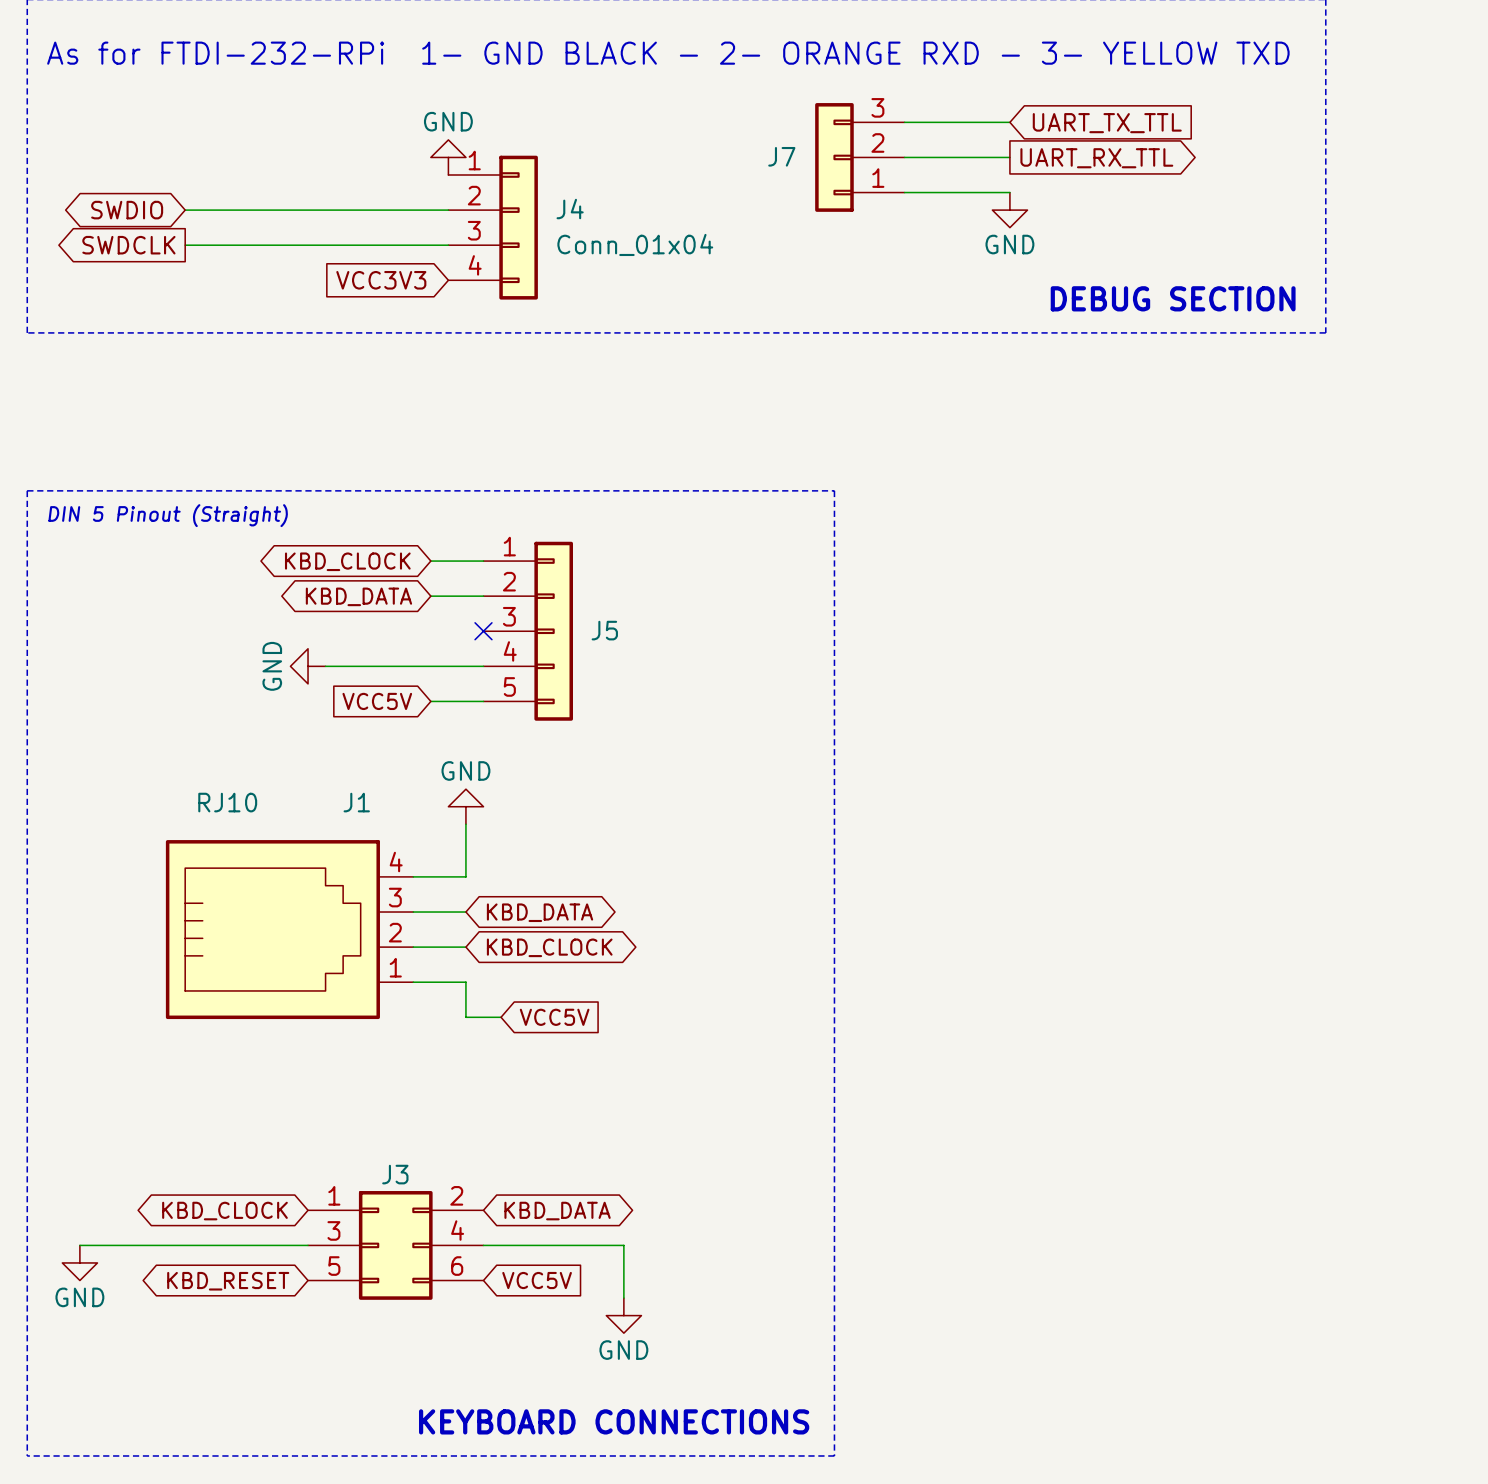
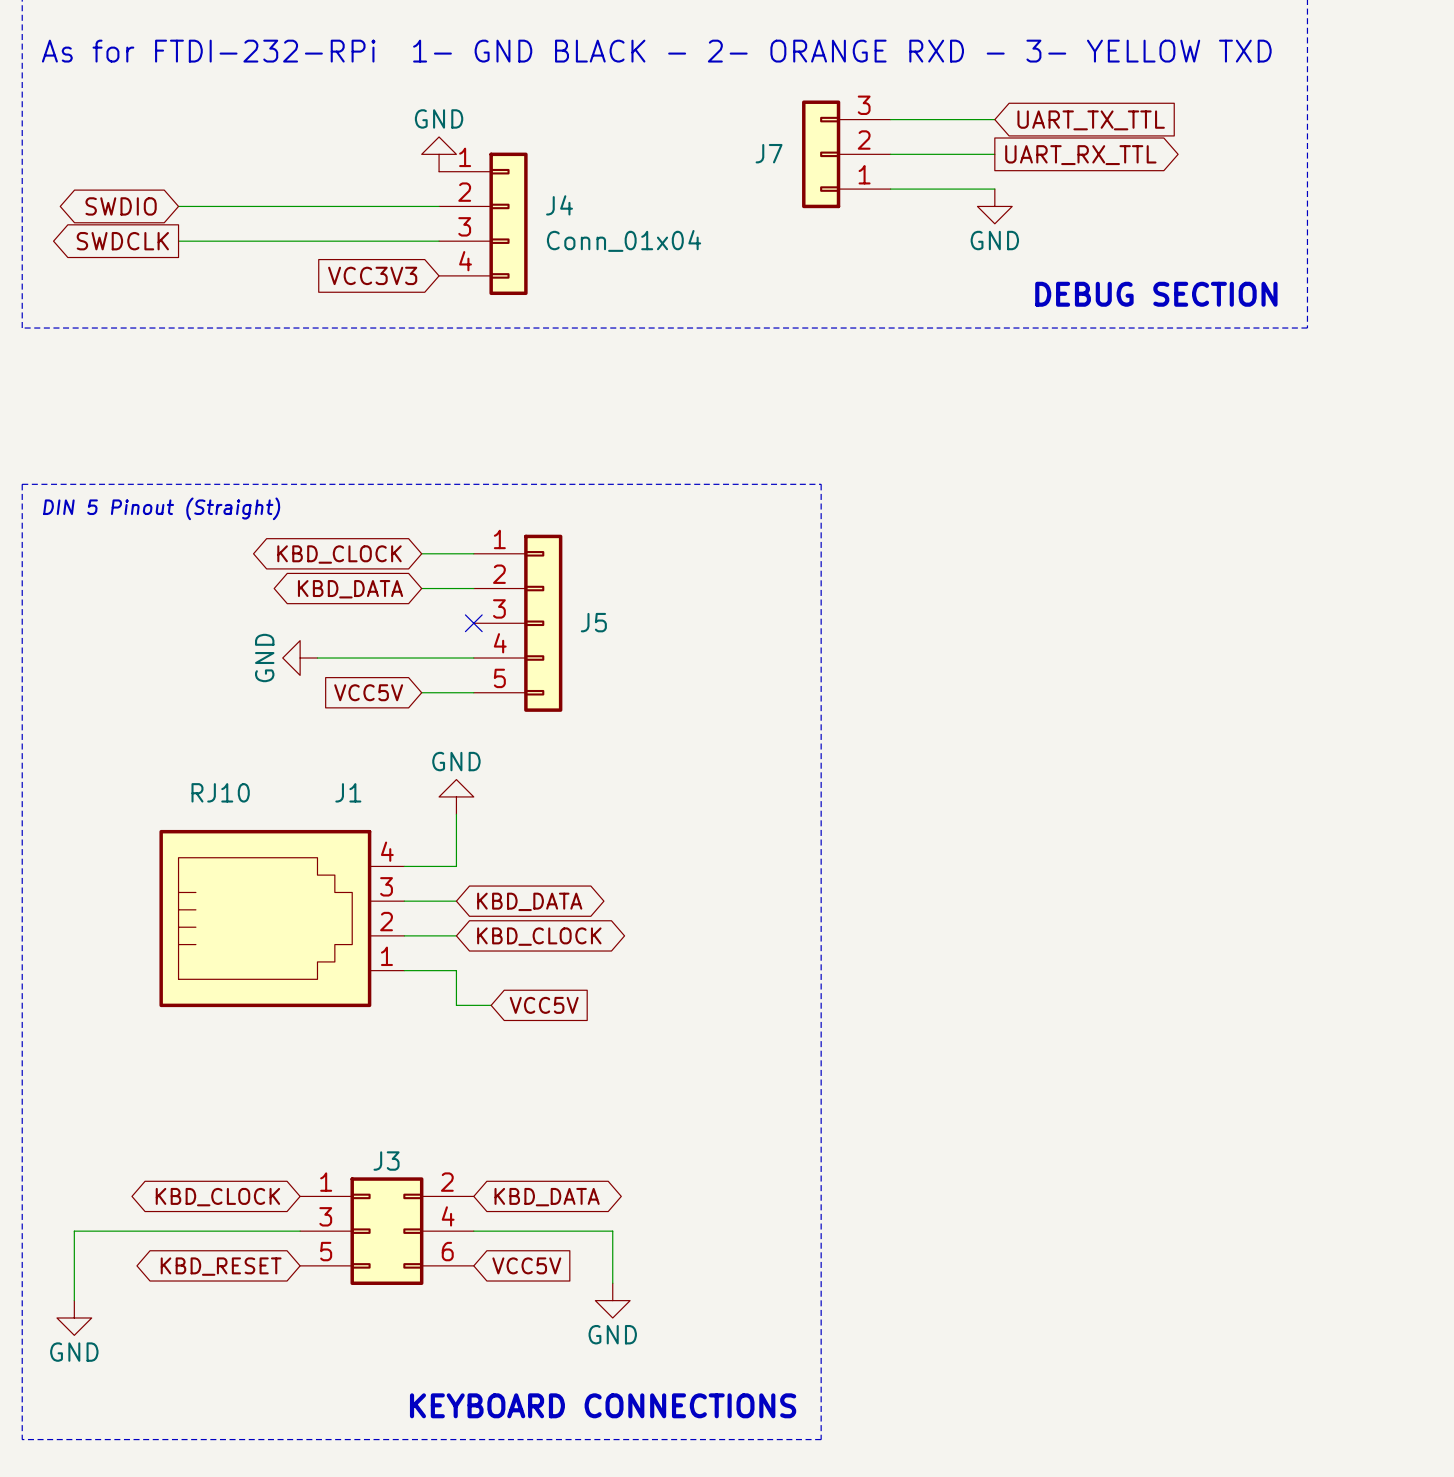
wire: none -> (74, 1231) (74, 1300)
power symbol position: GND (79, 1262) -> GND (74, 1317)

